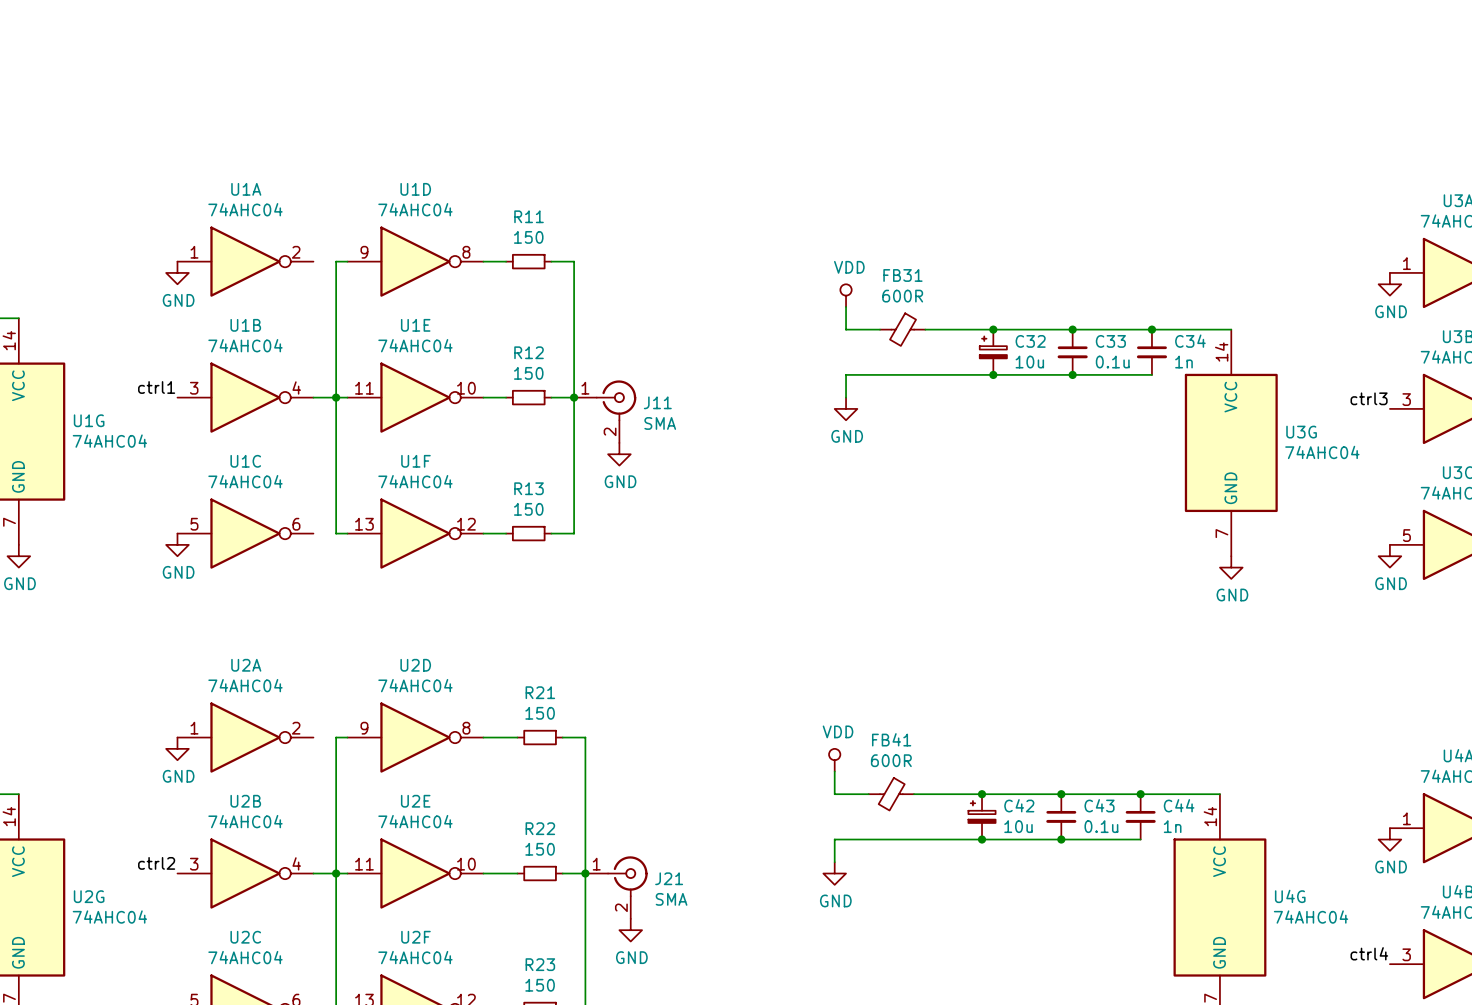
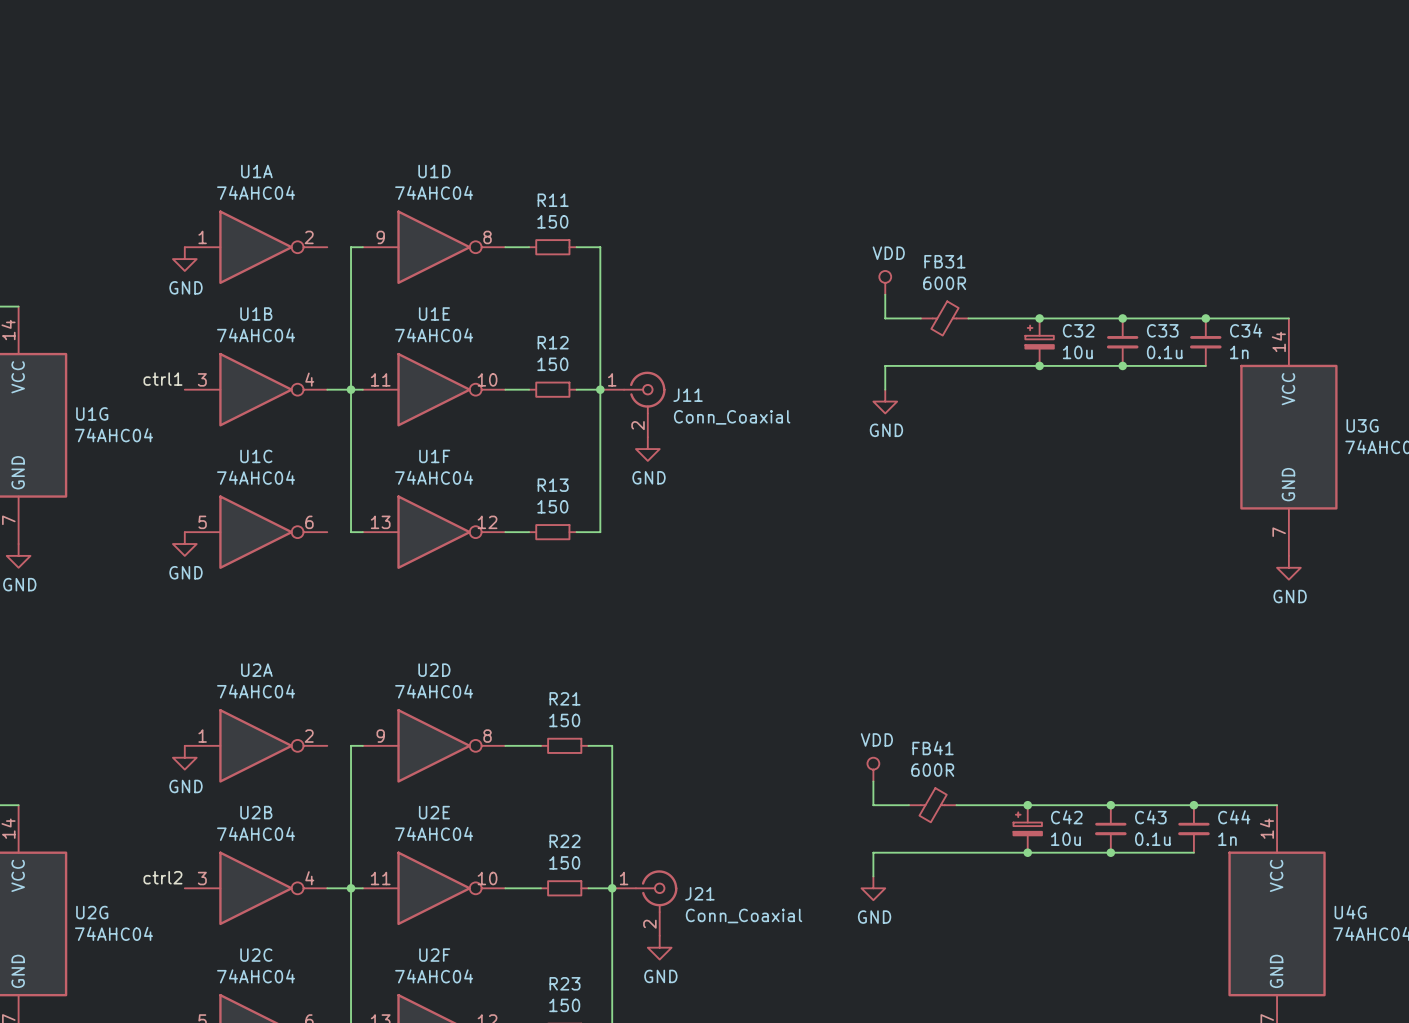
J11 value: SMA (660, 423) -> Conn_Coaxial (732, 417)
J21 value: SMA (671, 899) -> Conn_Coaxial (744, 915)

